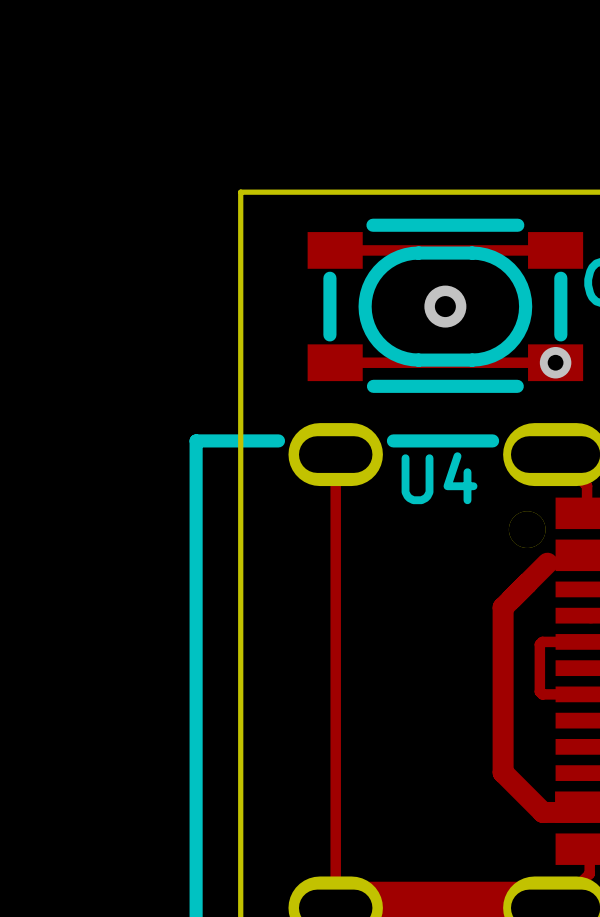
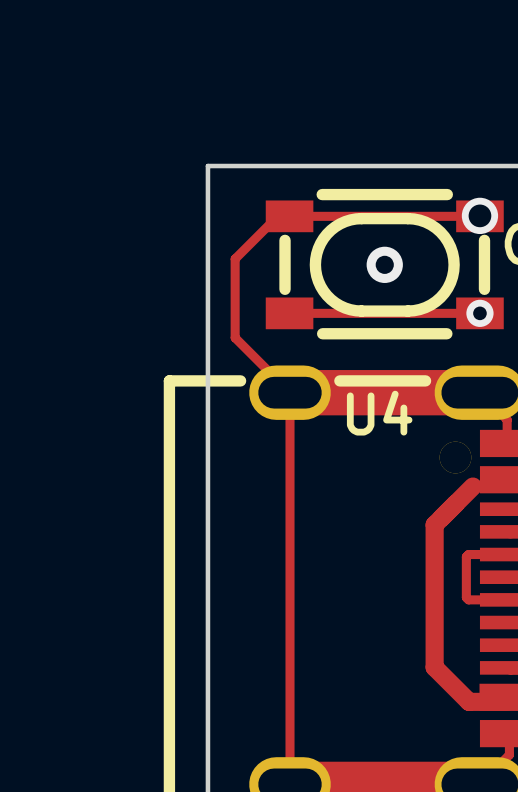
via: none -> (479, 215)
track: none -> (277, 216) (235, 258) (235, 337) (290, 392) (479, 392)

